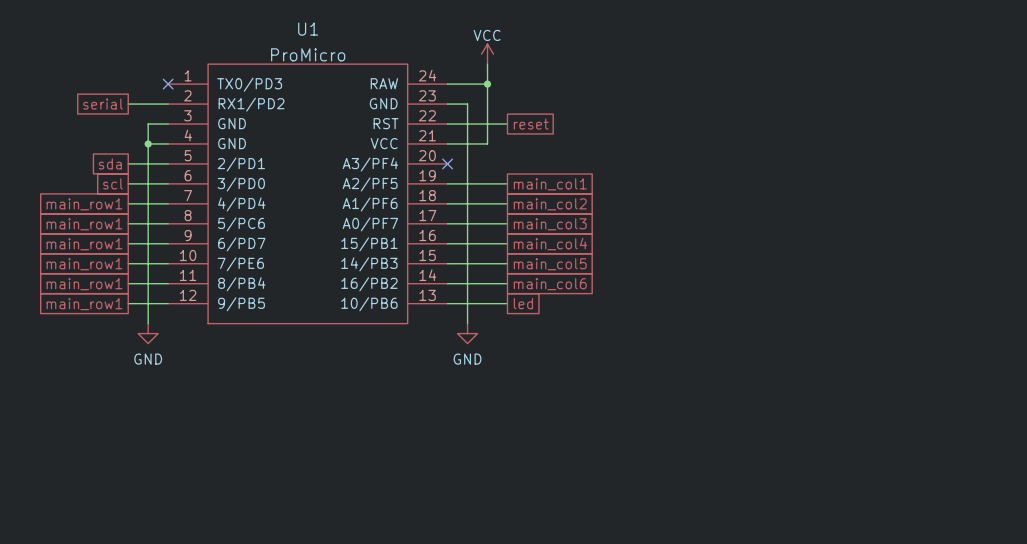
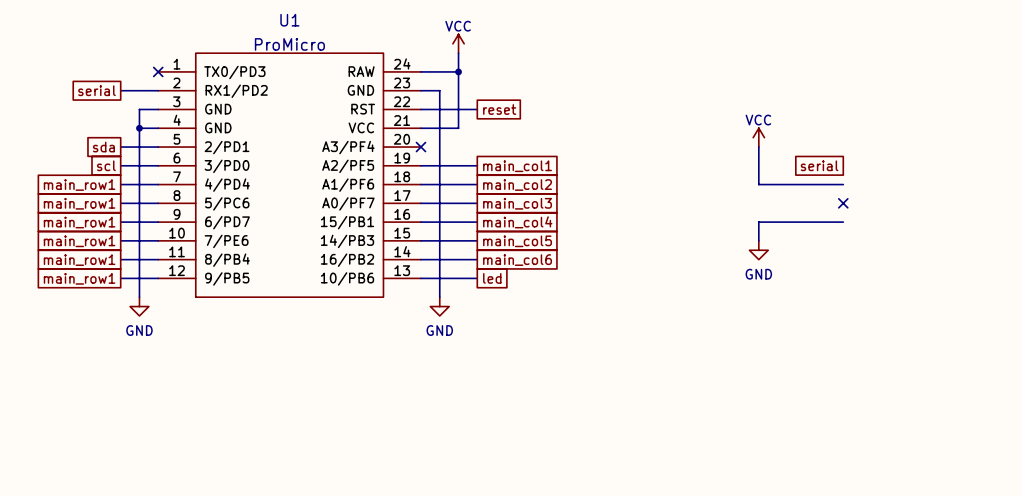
power symbol: none -> VCC (758, 137)
wire: none -> (758, 147) (758, 184) (843, 184)
global label: none -> serial (819, 165)
no-connect mark: none -> (843, 203)
wire: none -> (843, 222) (758, 222) (758, 240)
power symbol: none -> GND (758, 250)

